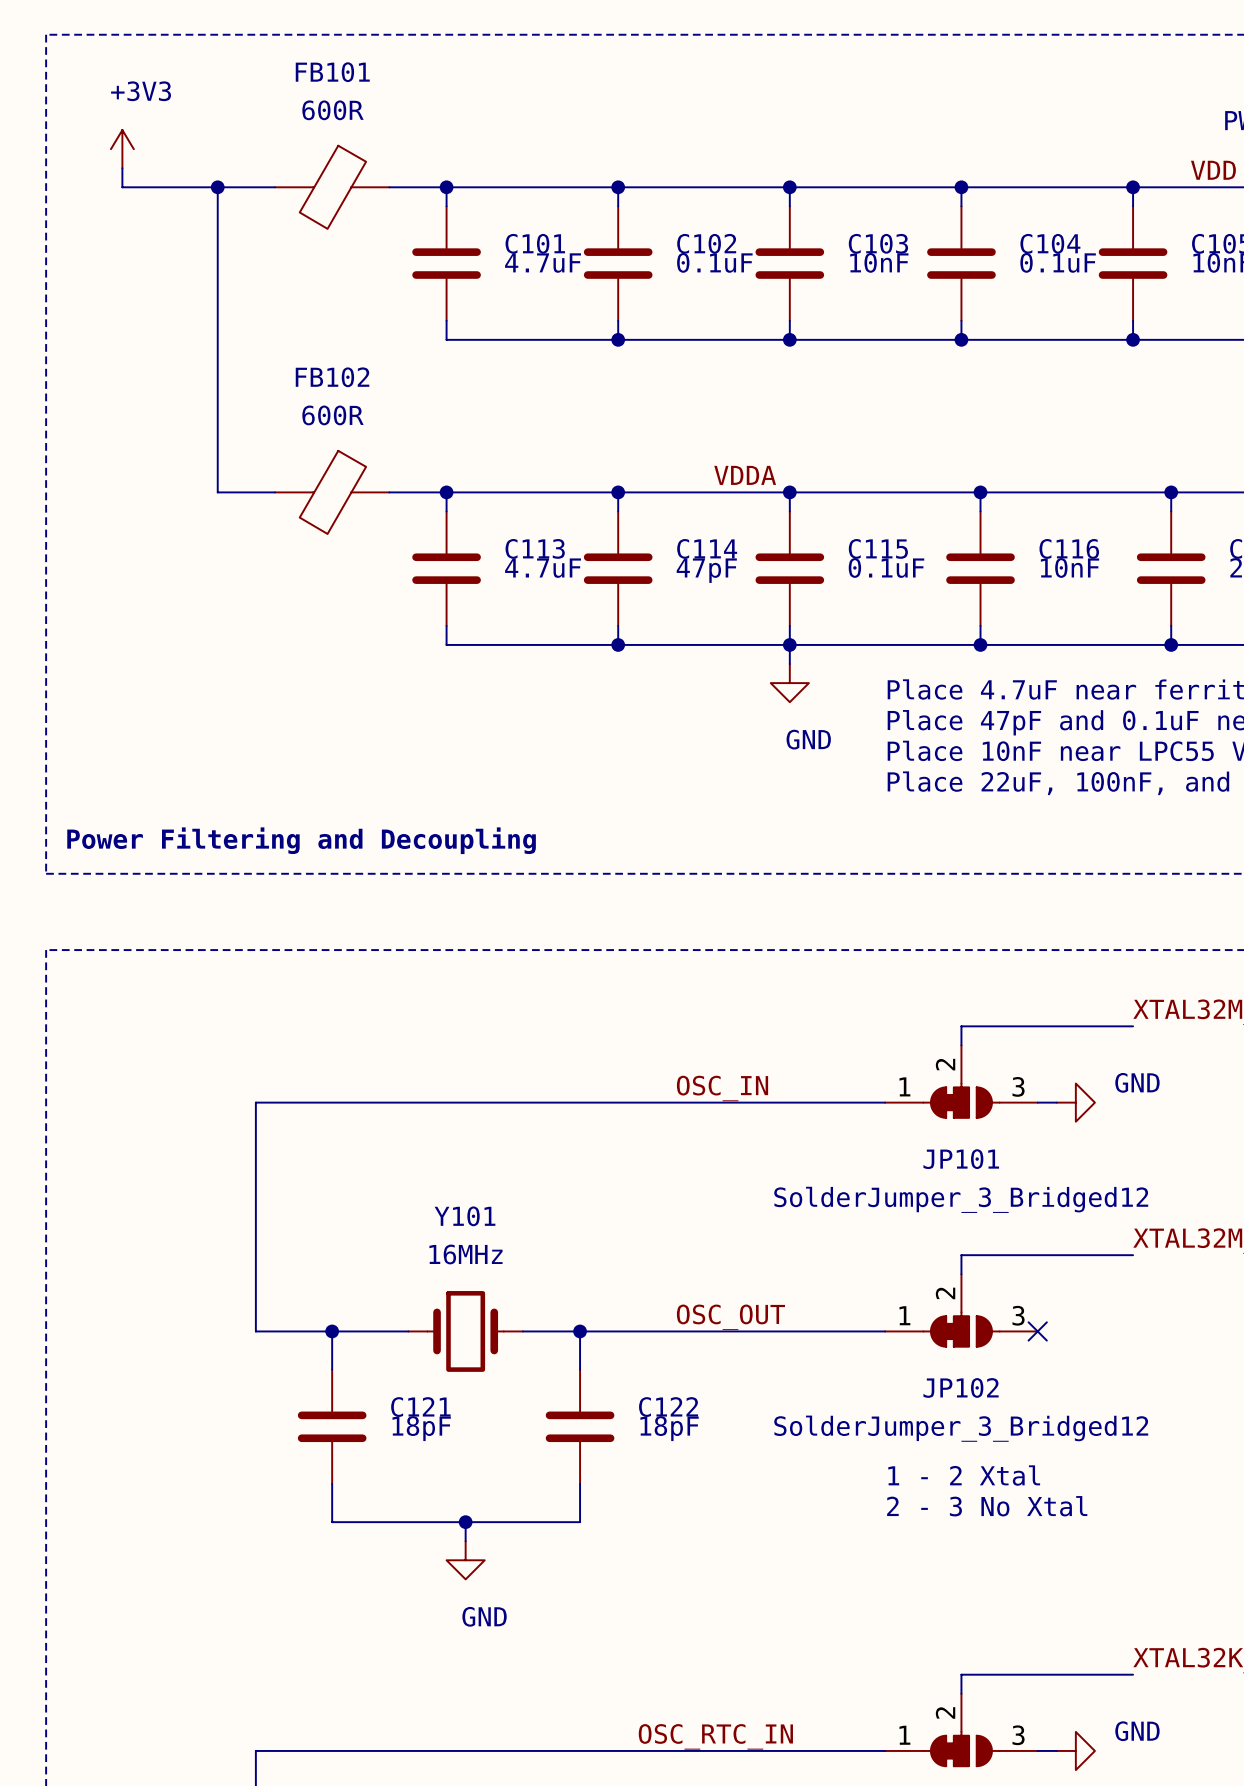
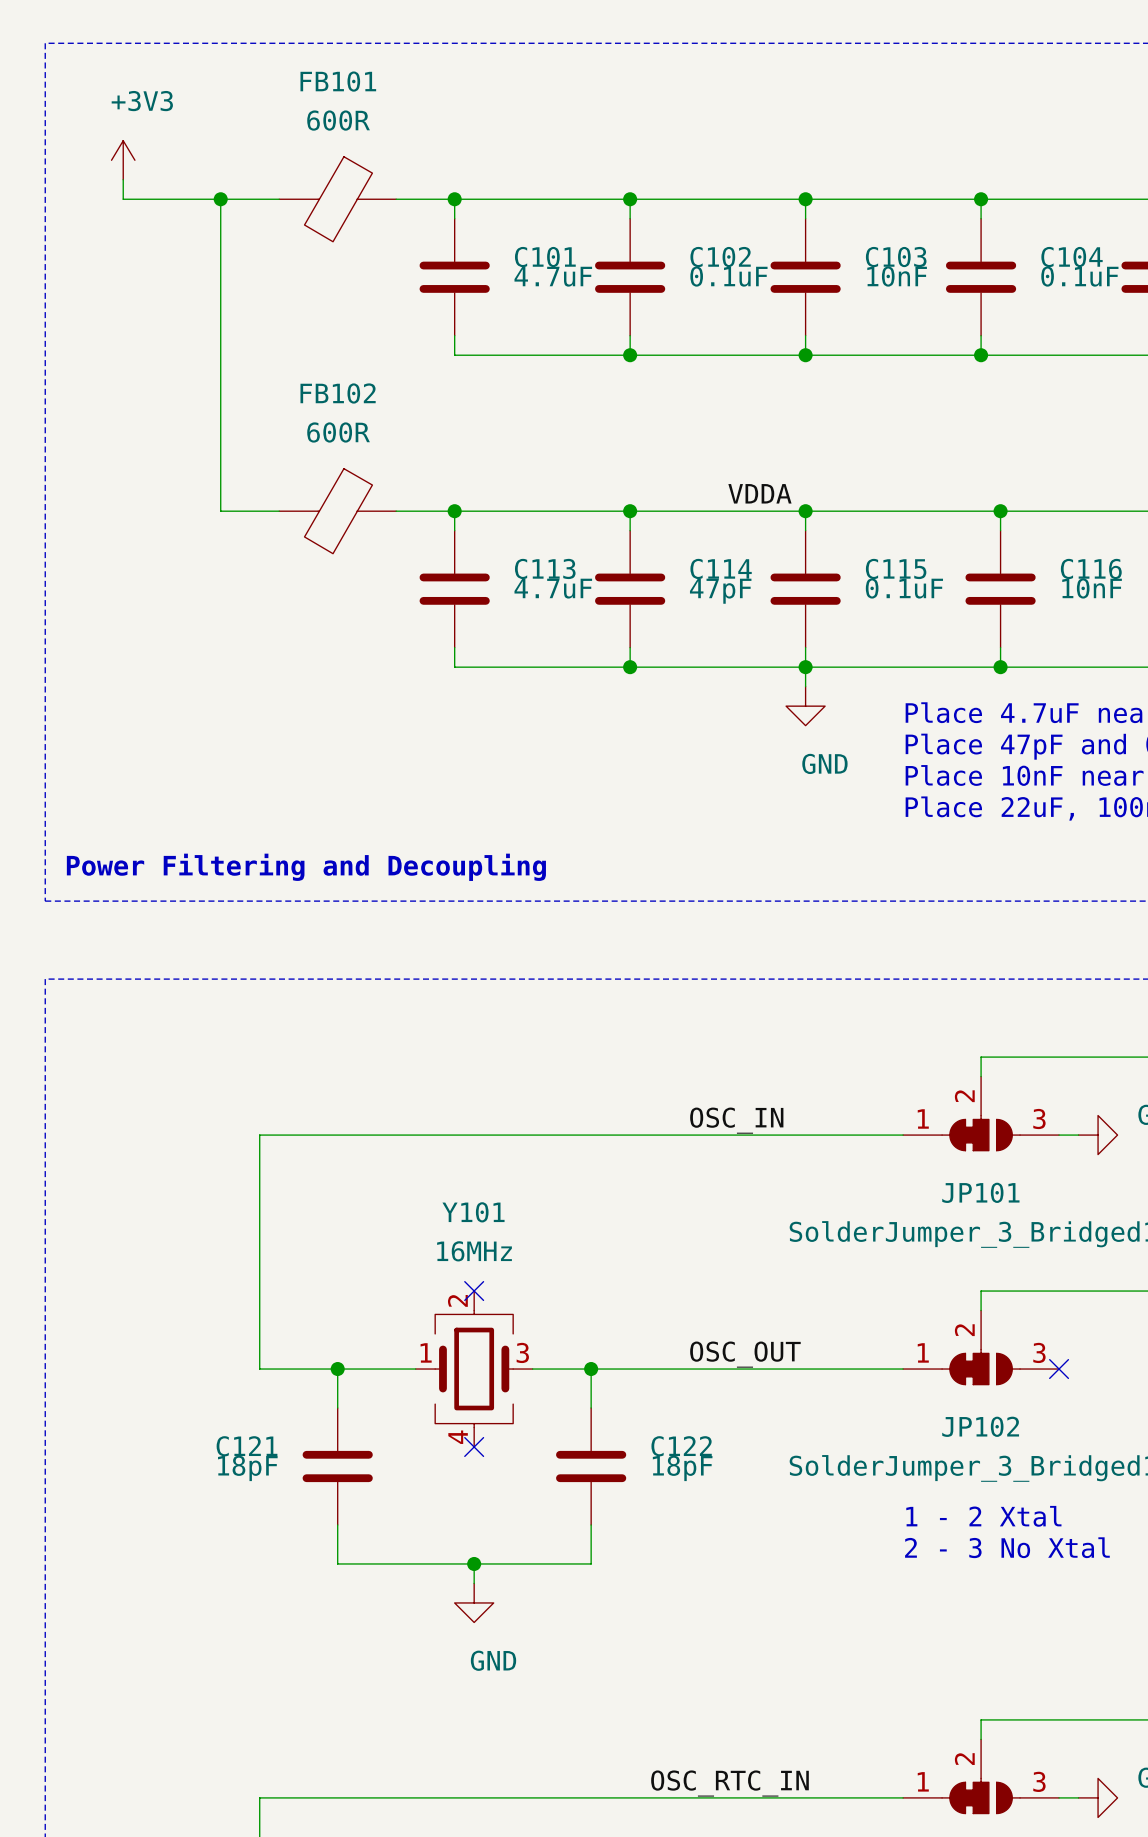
Y101 name position: Y101 (464, 1216) -> Y101 (473, 1212)
Y101 value position: 16MHz (465, 1254) -> 16MHz (474, 1251)
no-connect mark: none -> (474, 1291)
Y101 symbol: [408, 1291, 523, 1372] -> [415, 1291, 533, 1448]
C121 name position: C121 (420, 1407) -> C121 (247, 1446)
no-connect mark: none -> (474, 1447)
C121 value position: 18pF (421, 1428) -> 18pF (247, 1468)

